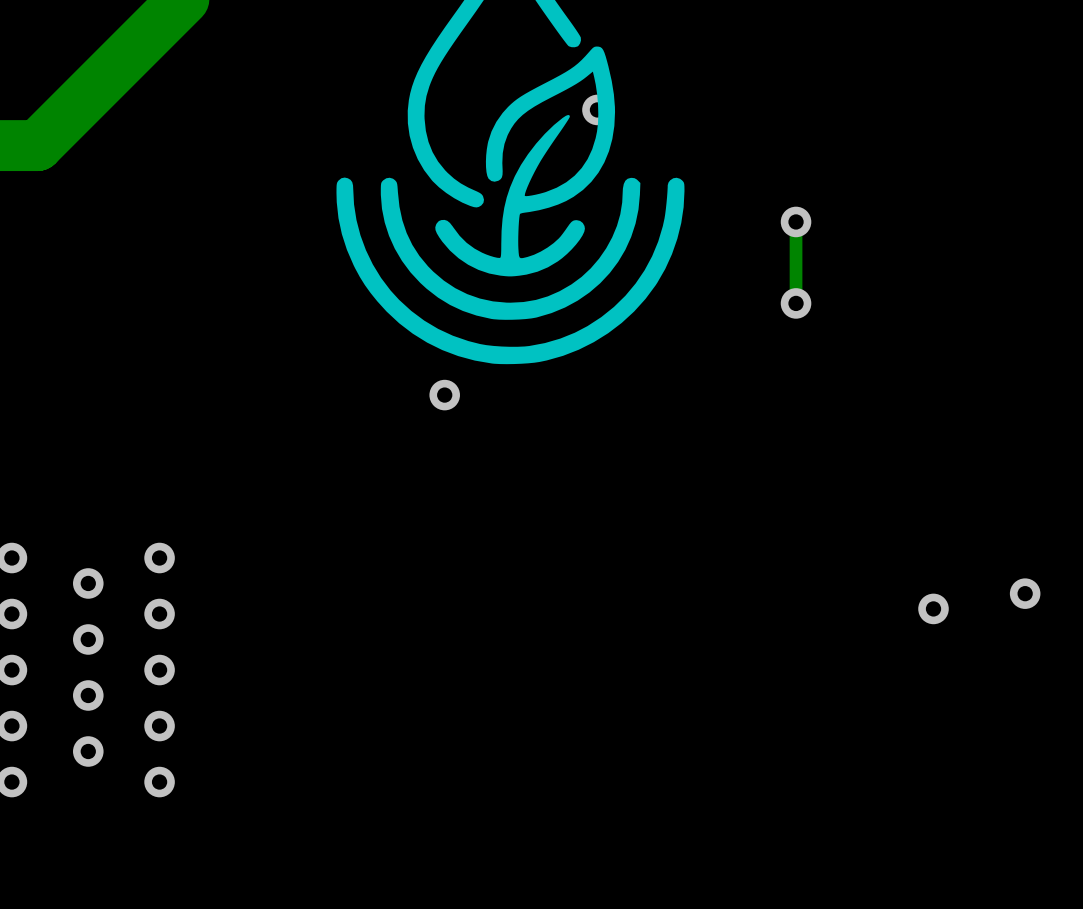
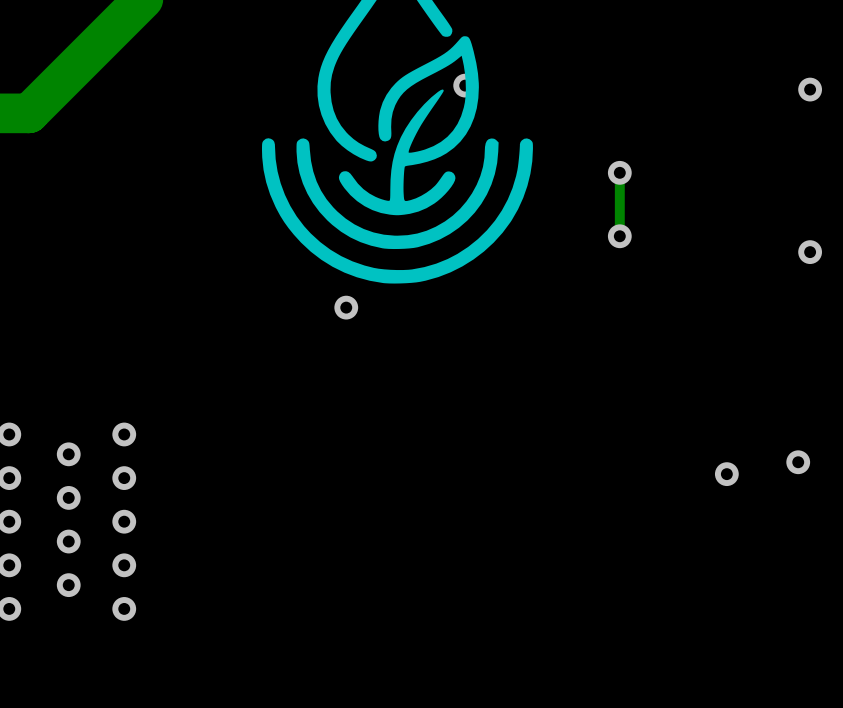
via: none -> (810, 89)
via: none -> (810, 252)

